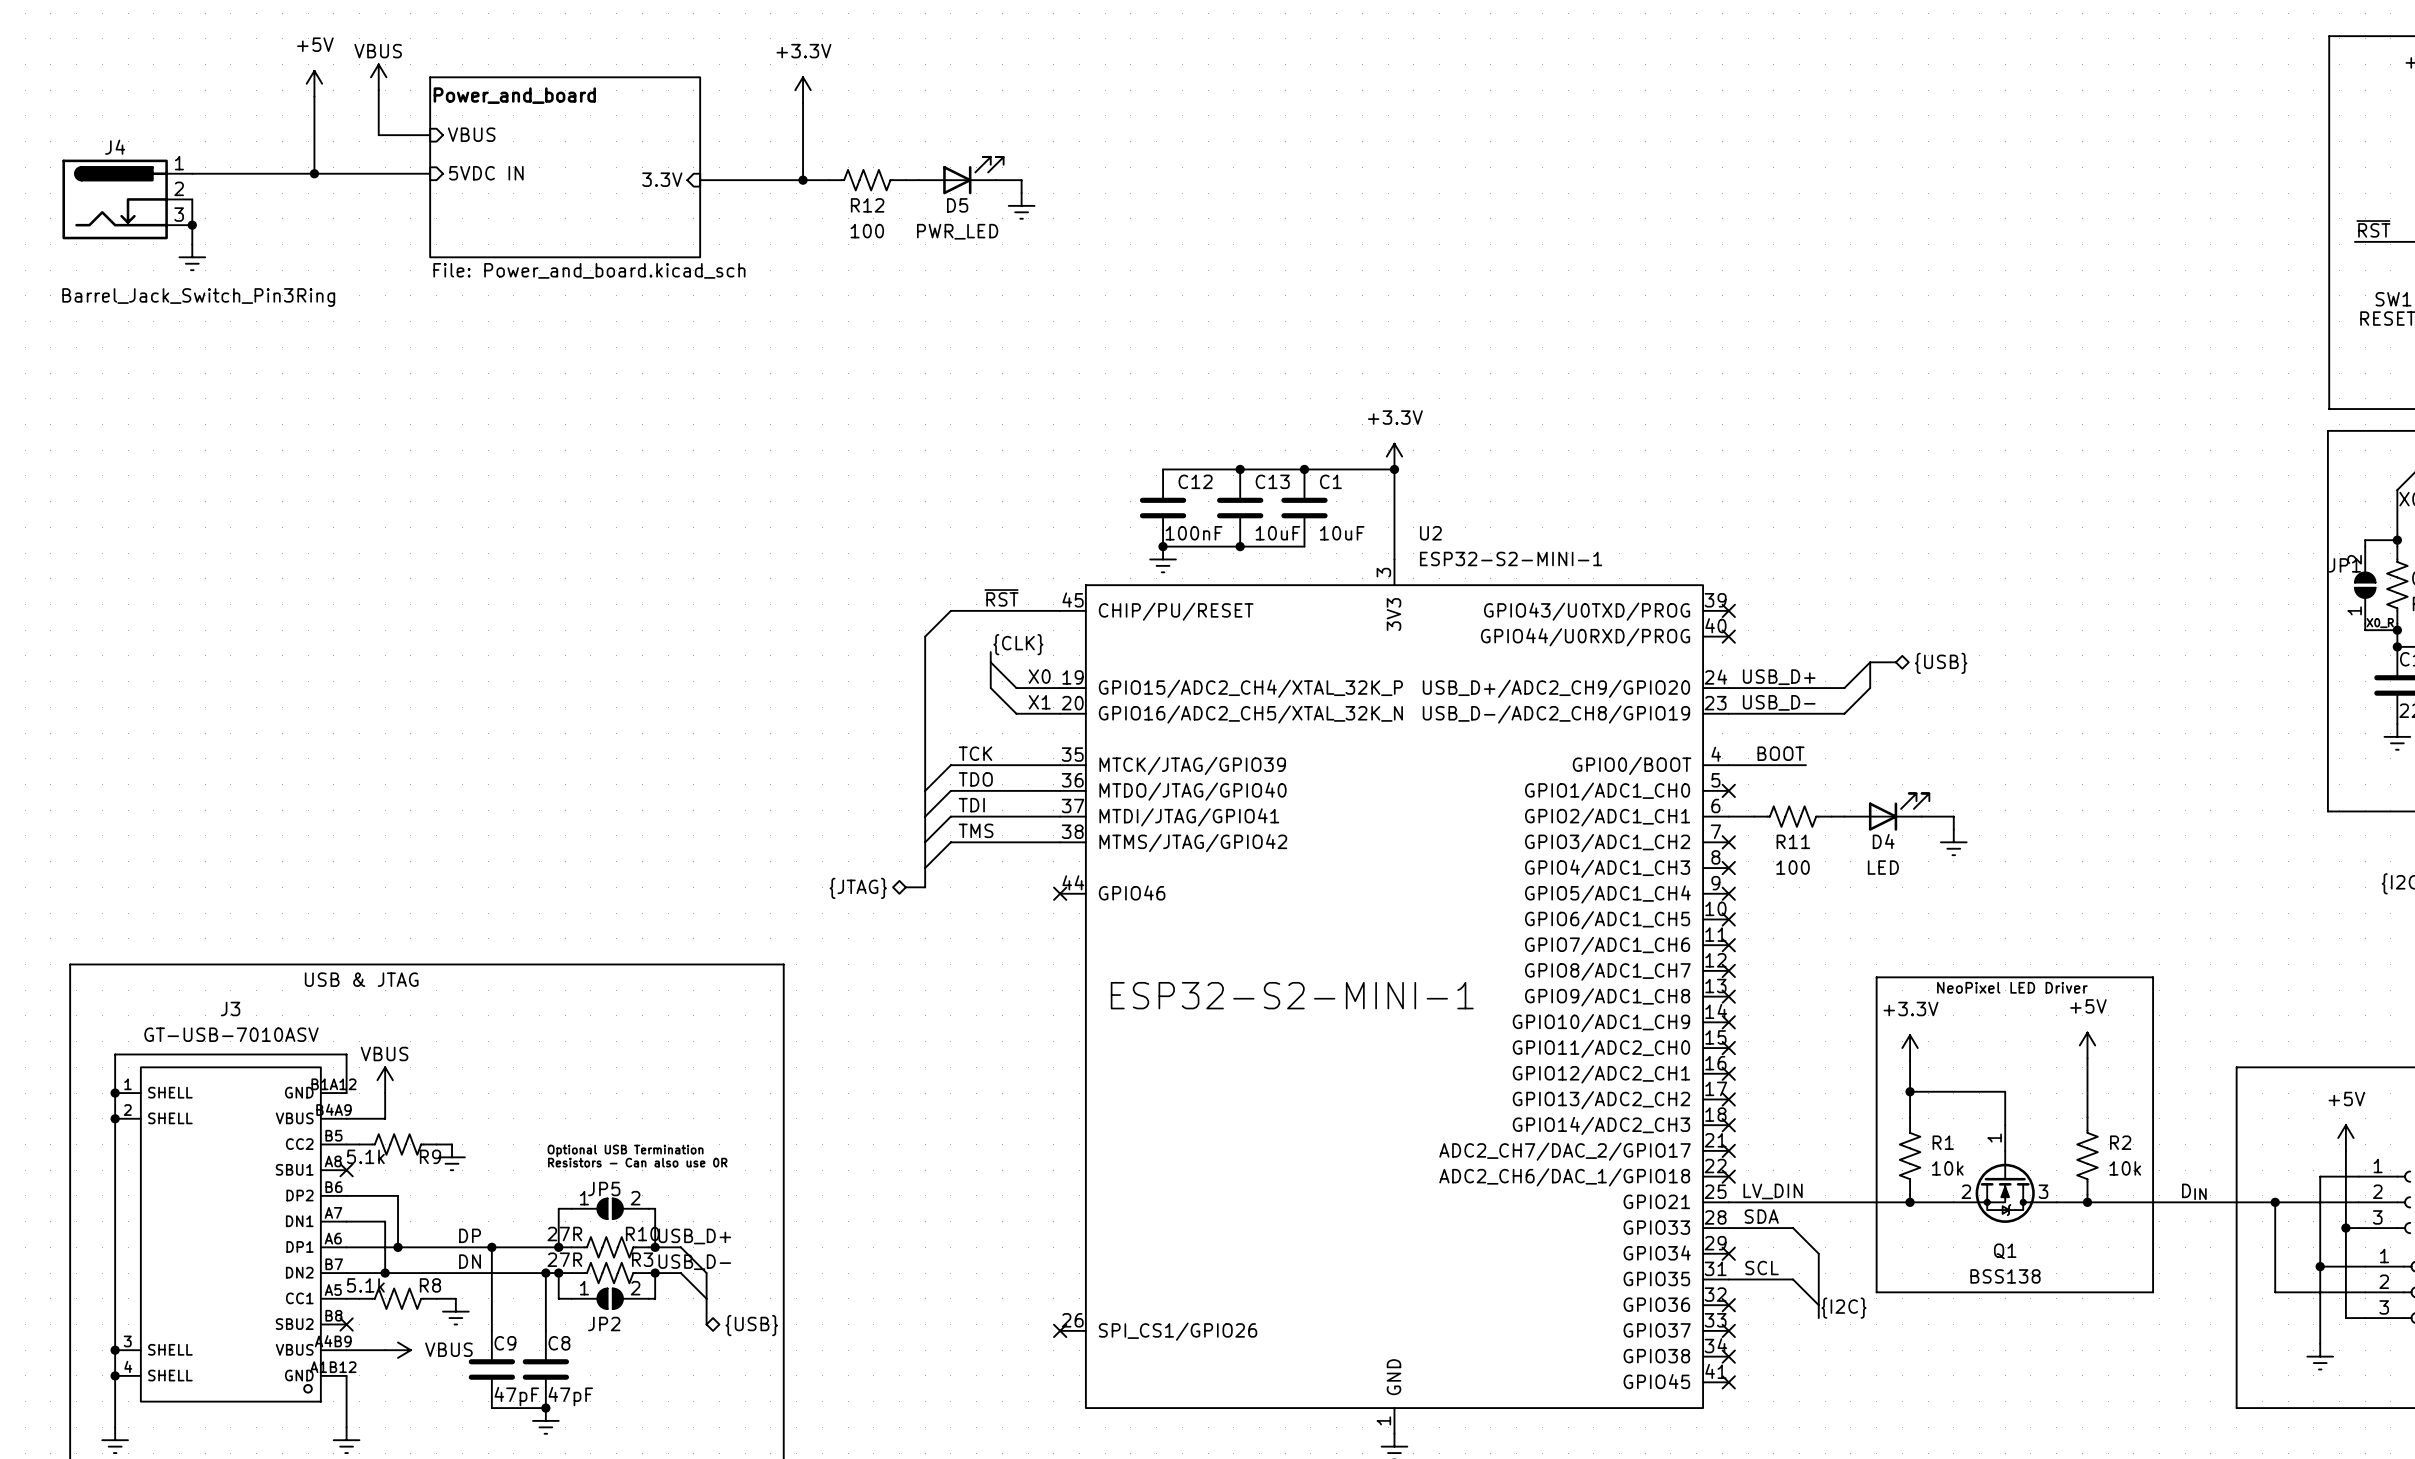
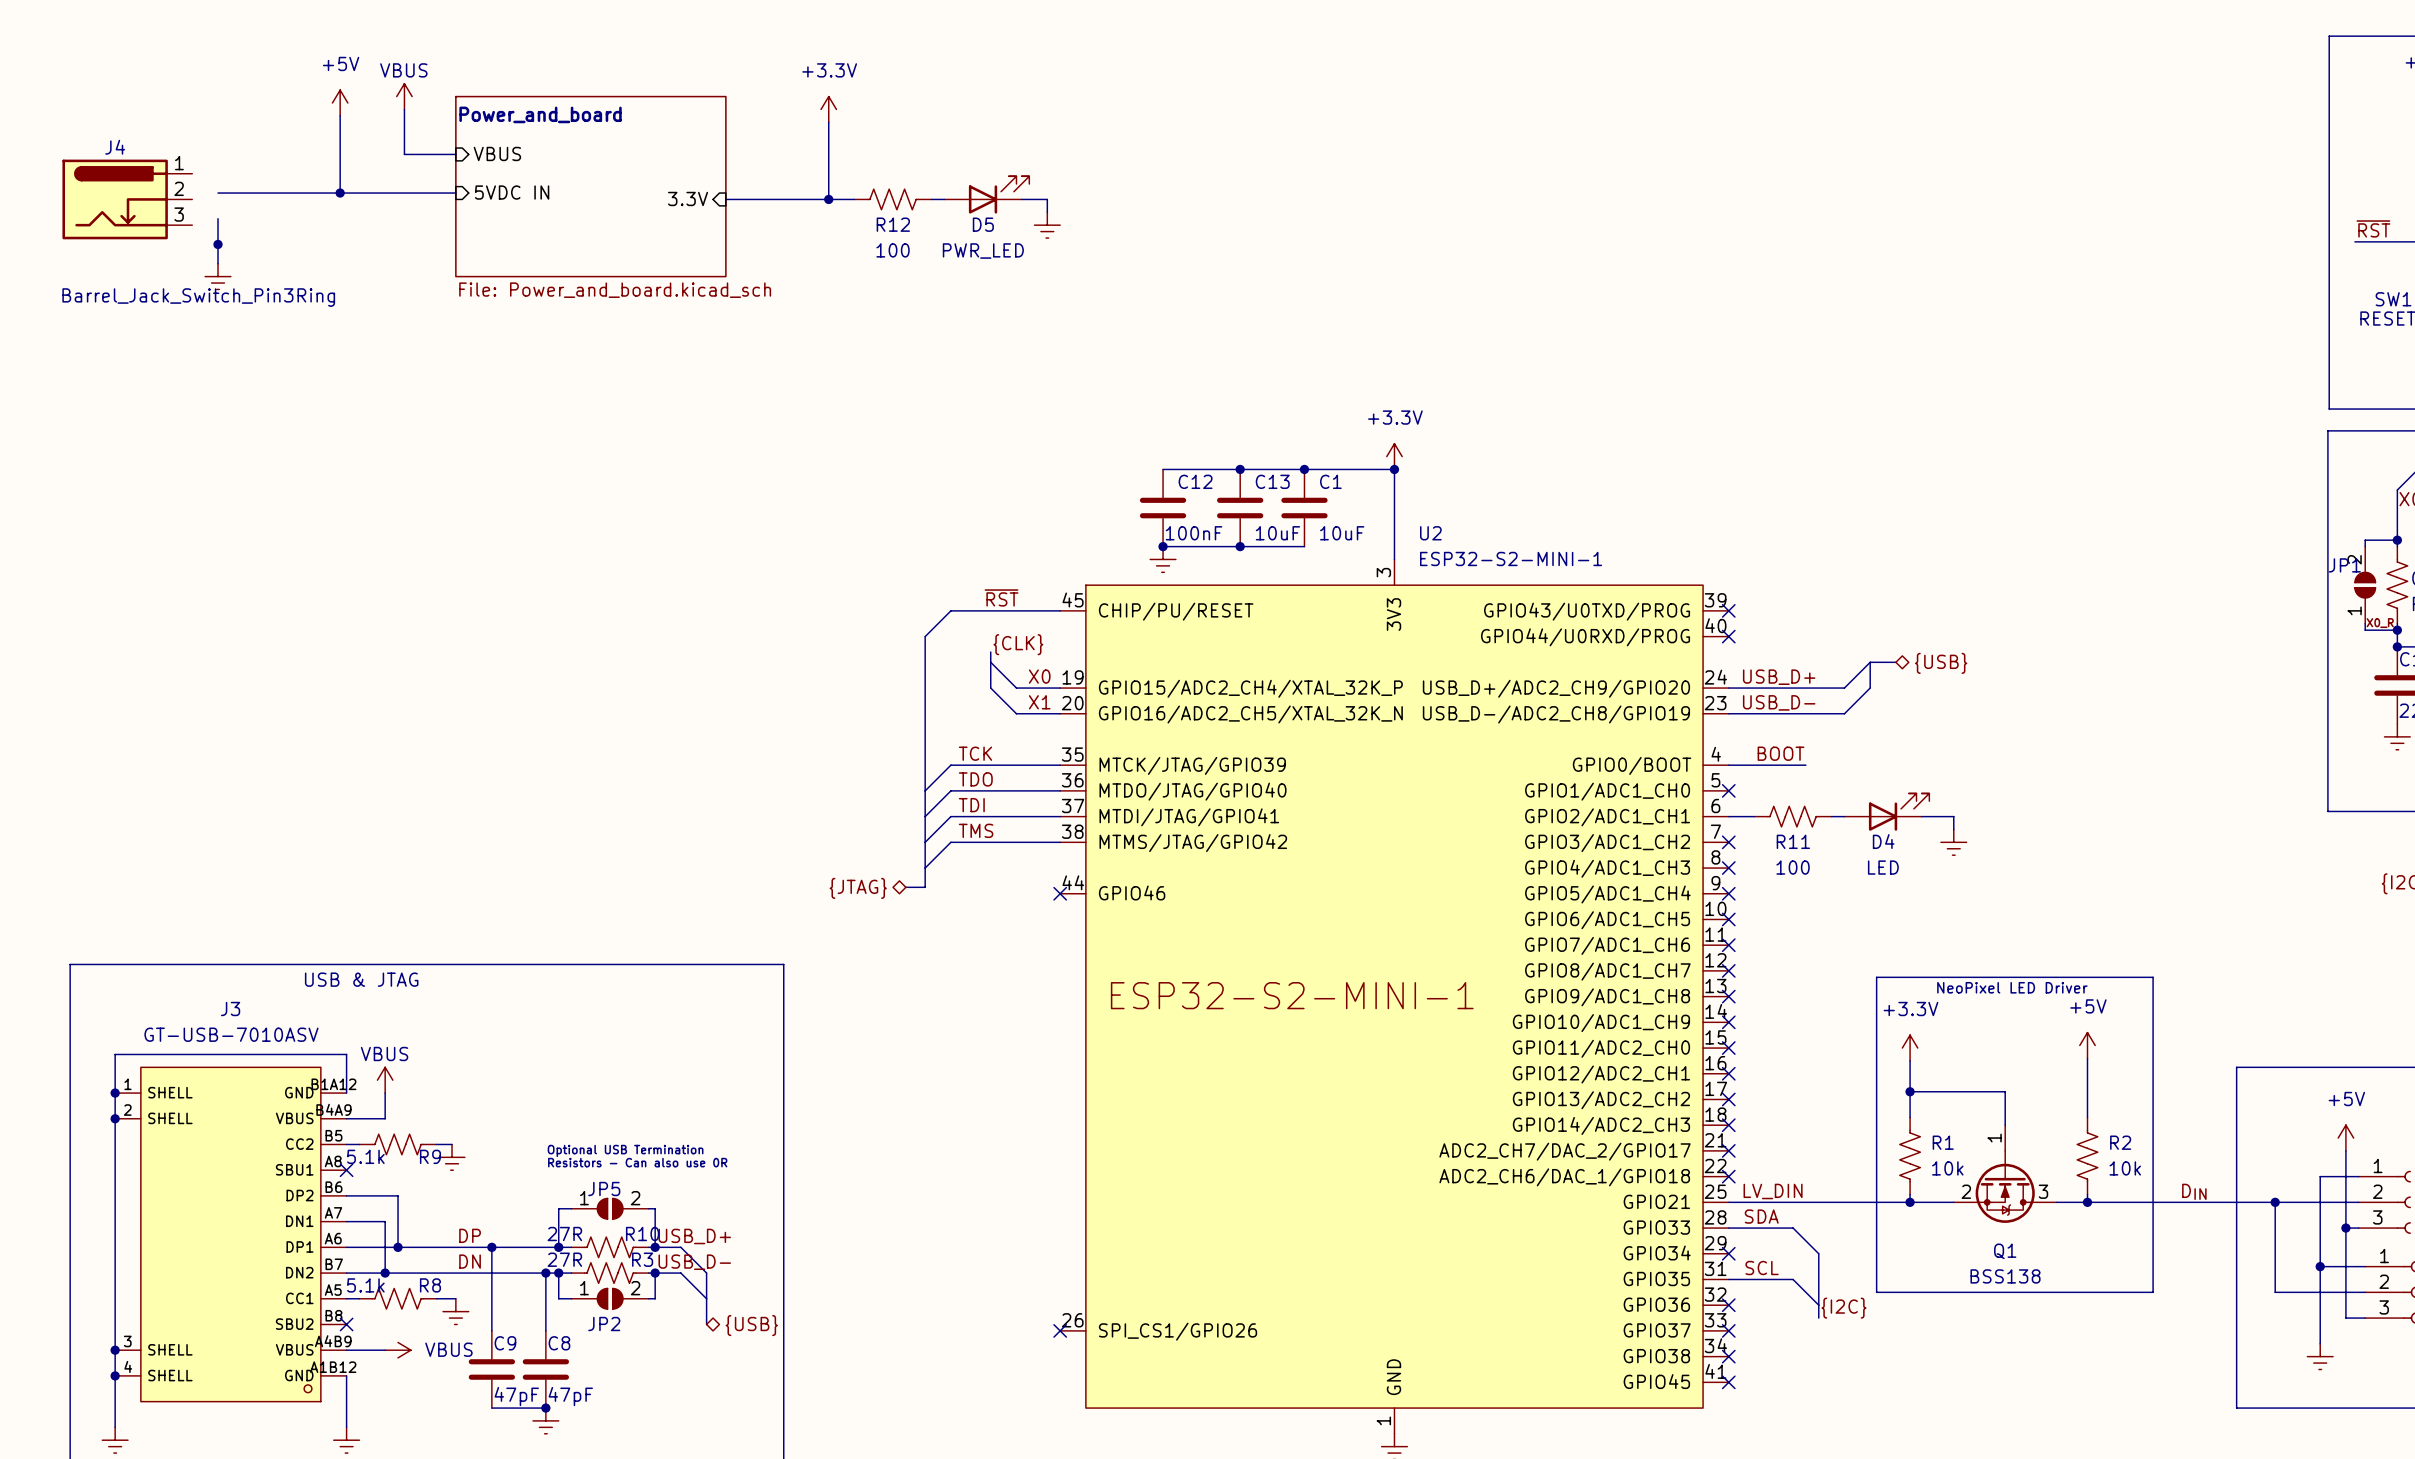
power symbol position: VBUS (378, 77) -> VBUS (404, 96)
power symbol position: +5V (314, 83) -> +5V (340, 103)
wire: (378, 90) (378, 135) (430, 135) -> (404, 109) (404, 154) (455, 154)
power symbol position: +3.3V (803, 90) -> +3.3V (828, 109)
wire: (314, 96) (314, 173) -> (340, 115) (340, 193)
wire: (803, 103) (803, 180) -> (828, 122) (828, 199)
sheet pin position: VBUS (471, 134) -> VBUS (497, 153)
sheet Power_and_board position: (565, 167) -> (590, 186)
wire: (192, 173) (430, 173) -> (218, 193) (455, 193)
junction position: (314, 173) -> (340, 193)
sheet pin position: 5VDC IN (486, 173) -> 5VDC IN (512, 192)
D5 position: (961, 175) -> (986, 194)
sheet pin position: 3.3V (662, 179) -> 3.3V (688, 198)
wire: (700, 180) (828, 180) -> (725, 199) (854, 199)
junction position: (803, 180) -> (828, 199)
R12 position: (867, 180) -> (893, 199)
wire: (905, 180) (918, 180) -> (931, 199) (944, 199)
wire: (995, 180) (1021, 180) (1021, 193) -> (1021, 199) (1047, 199) (1047, 212)
wire: (192, 199) (192, 244) -> (218, 218) (218, 263)
power symbol position: (1021, 205) -> (1047, 225)
junction position: (192, 225) -> (218, 244)
power symbol position: (192, 257) -> (218, 276)

